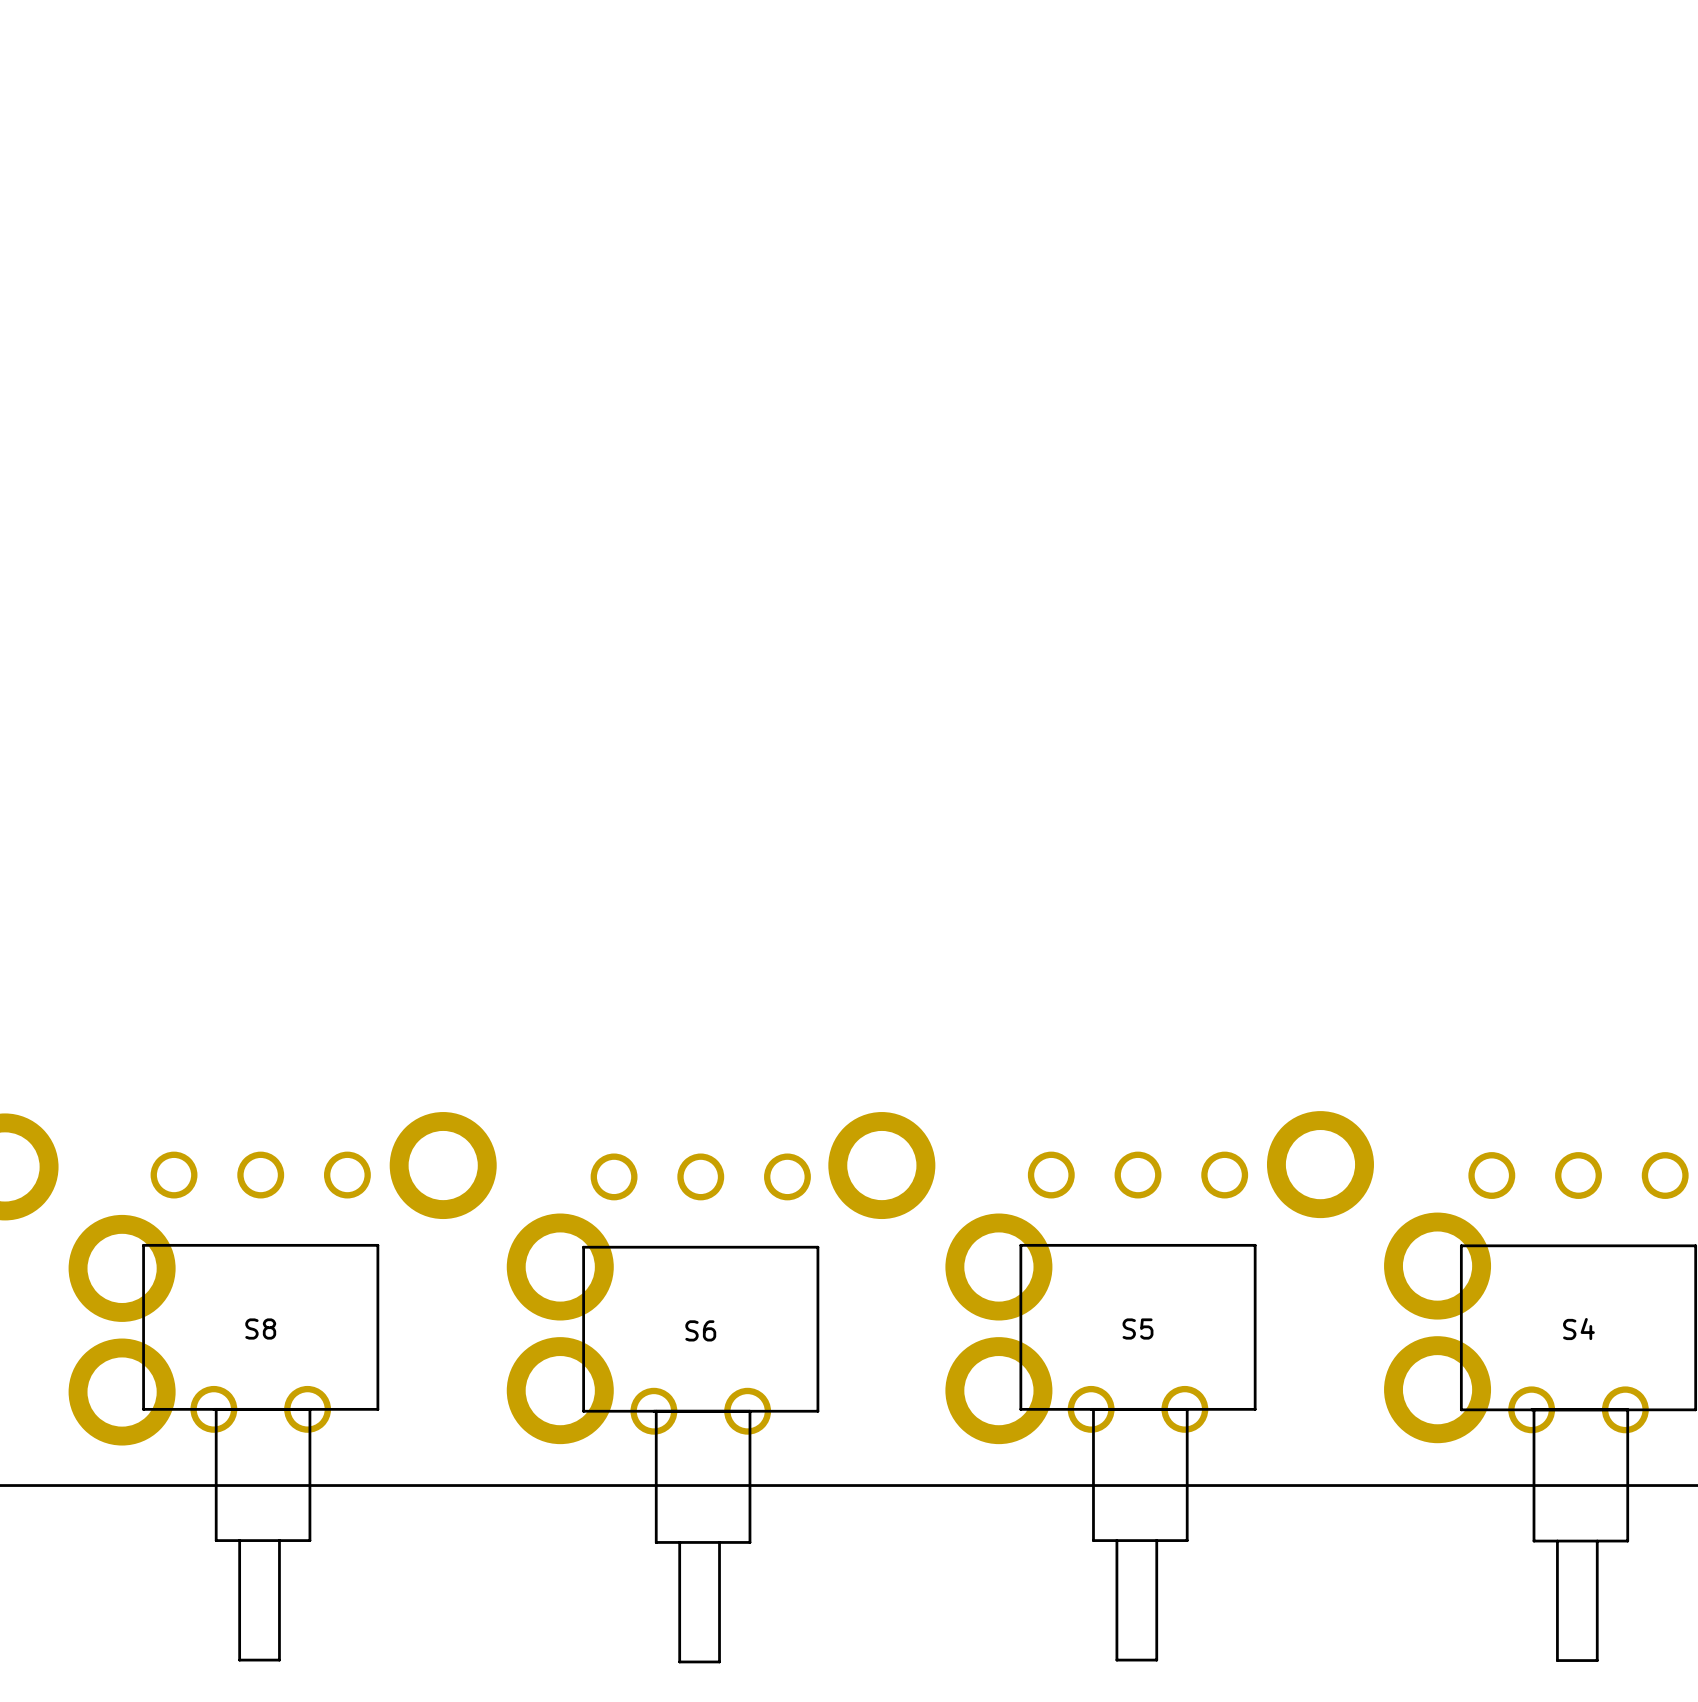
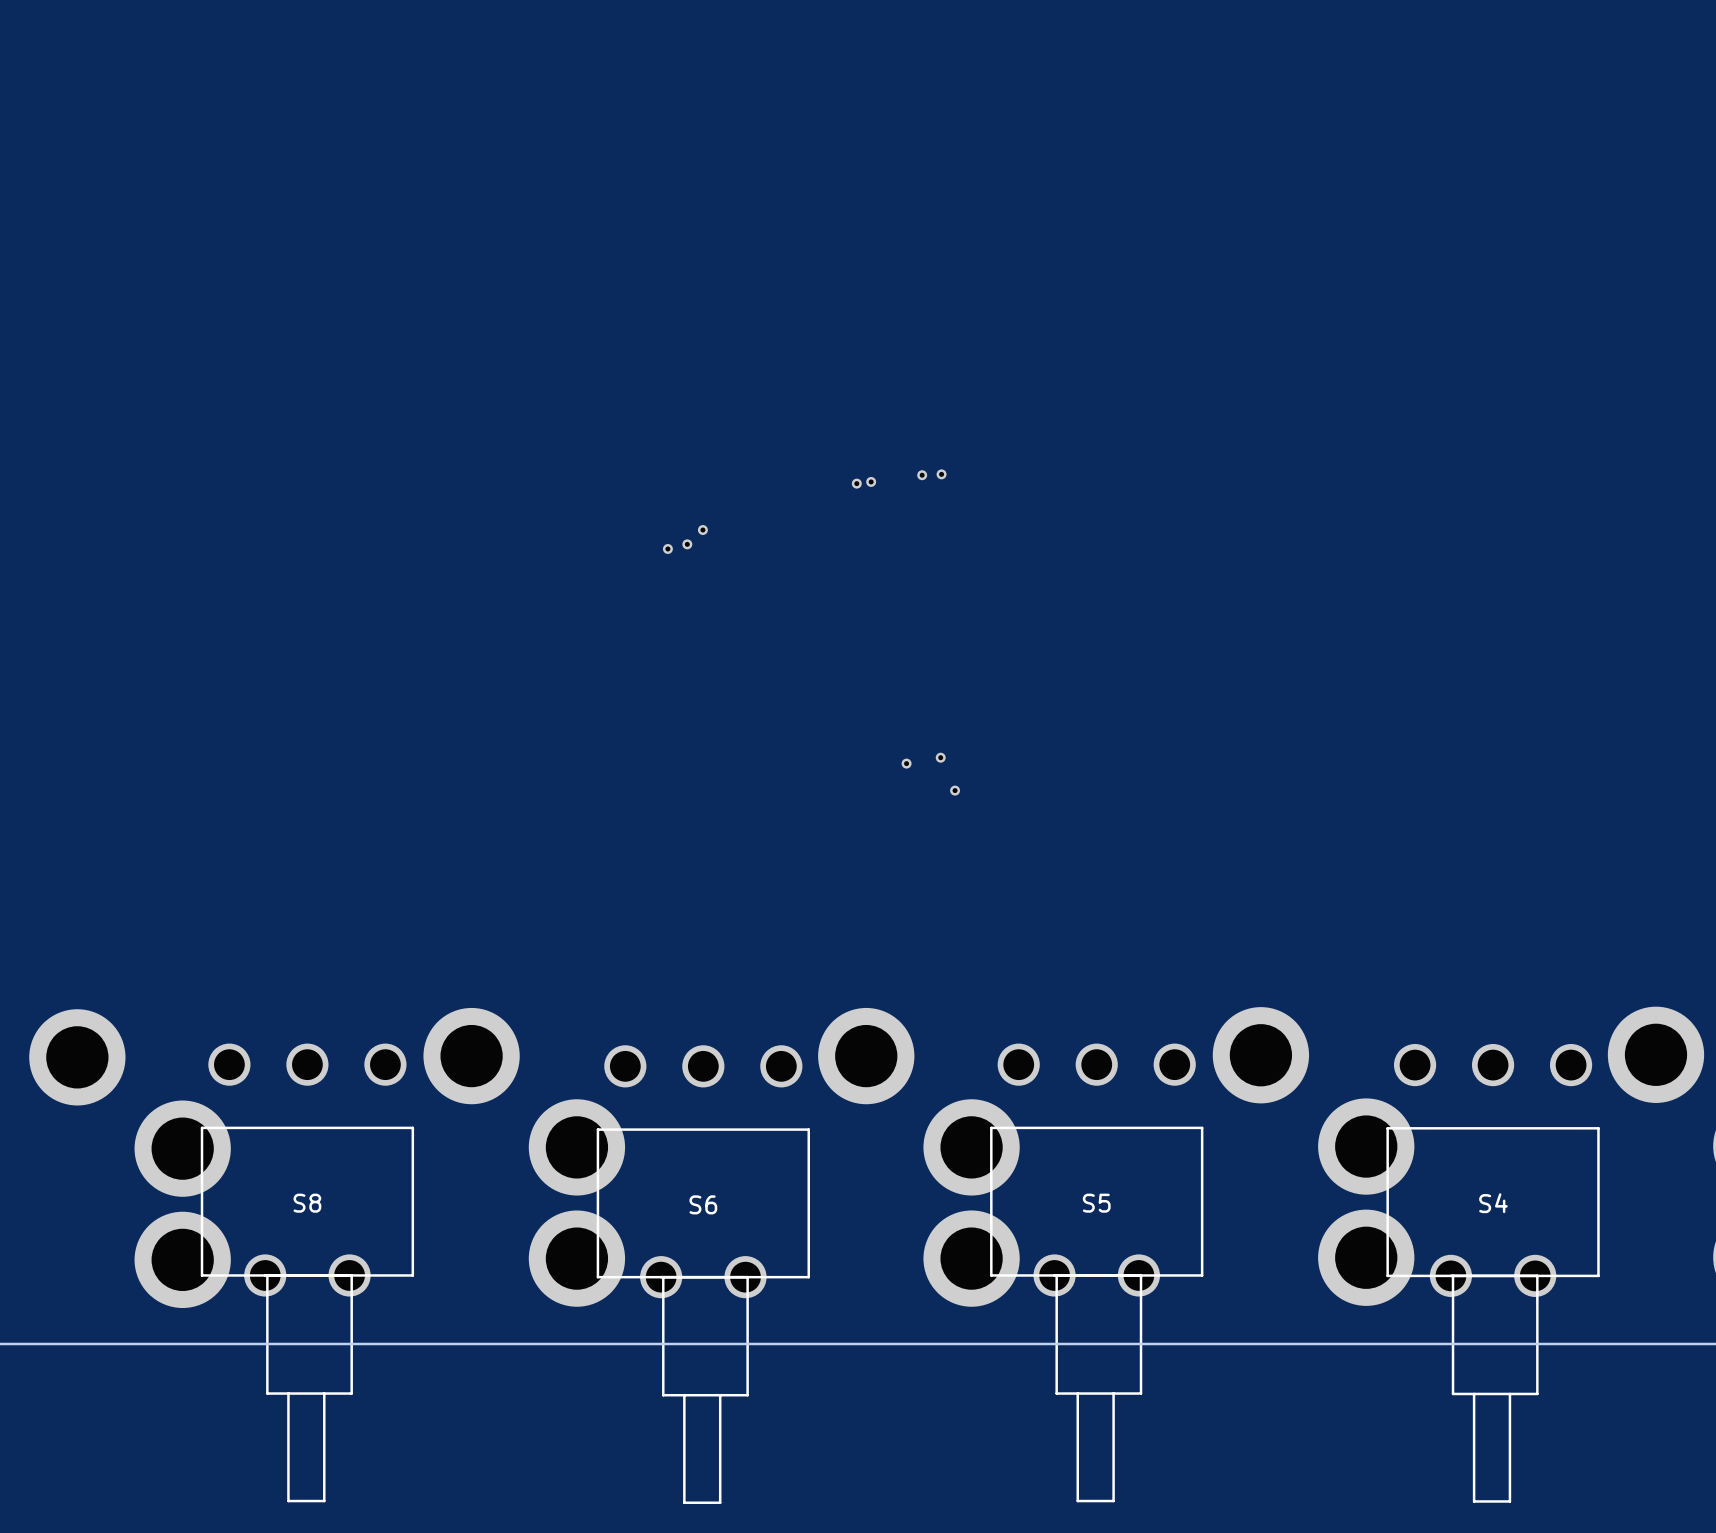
part: none -> (941, 474)
part: none -> (922, 475)
part: none -> (871, 481)
part: none -> (856, 483)
part: none -> (702, 530)
part: none -> (687, 544)
part: none -> (667, 548)
part: none -> (940, 757)
part: none -> (906, 763)
part: none -> (955, 790)

